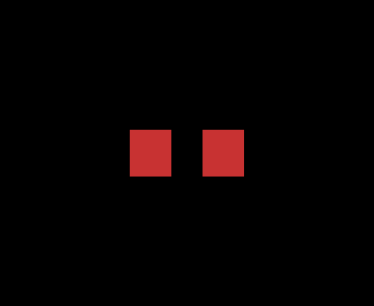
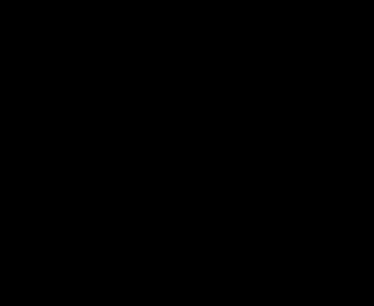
part: (186, 153) -> none

